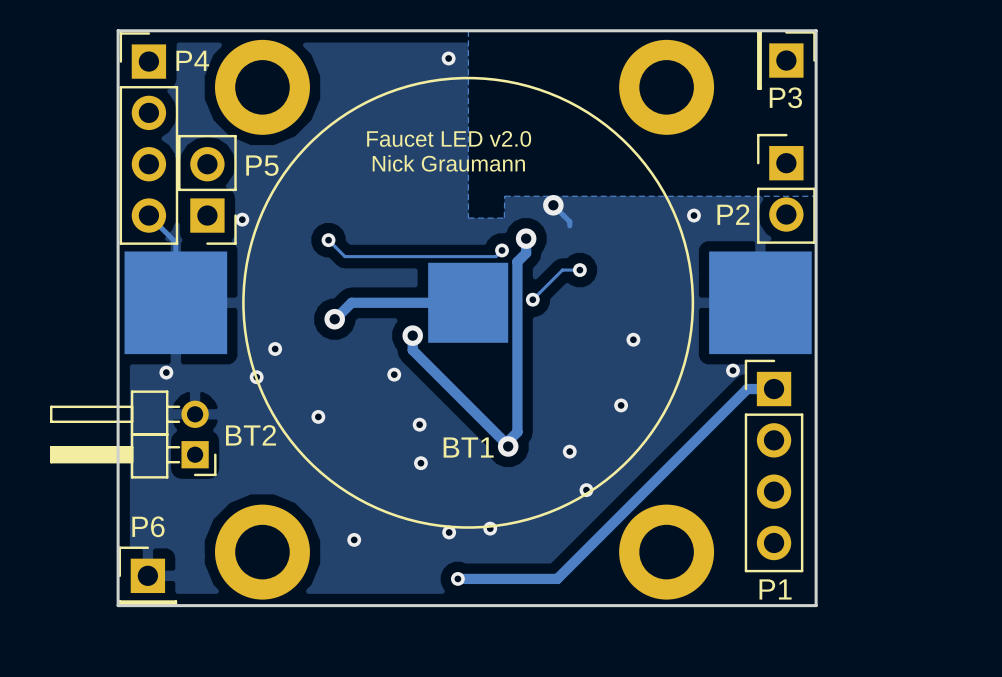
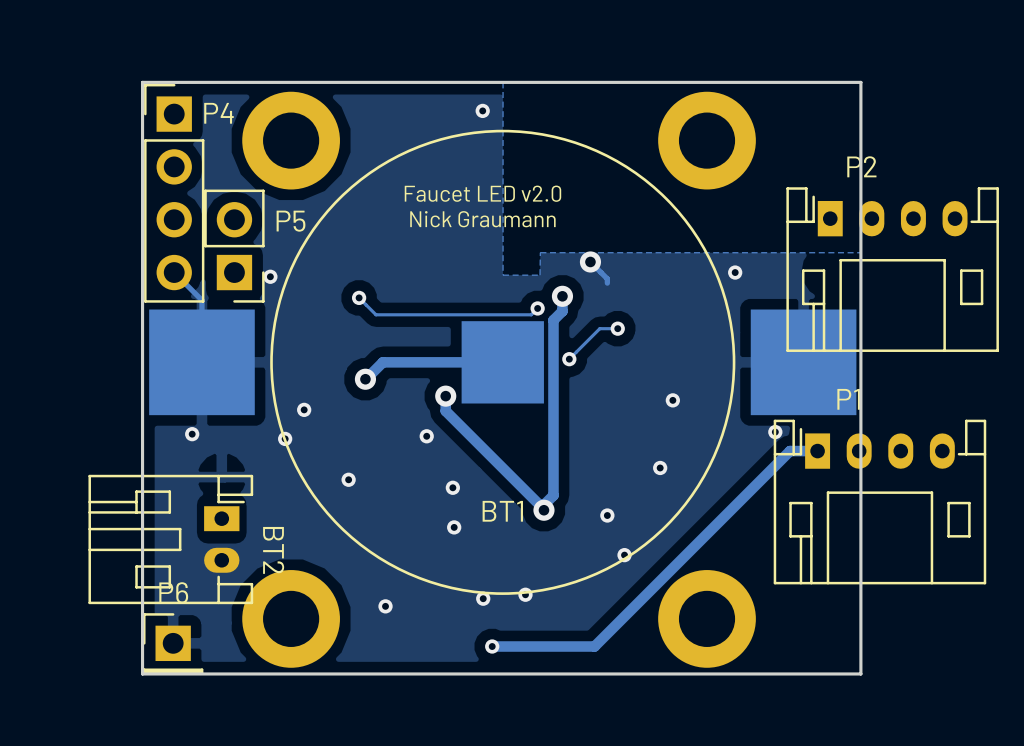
P3: (786, 60) -> none
P2 footprint: [757, 133, 816, 244] -> [786, 187, 999, 352]
P2 name position: P2 (733, 214) -> P2 (861, 166)
P1 footprint: [744, 359, 804, 573] -> [773, 419, 987, 585]
BT2 footprint: [50, 390, 217, 479] -> [88, 474, 254, 605]
P1 name position: P1 (775, 589) -> P1 (848, 399)

